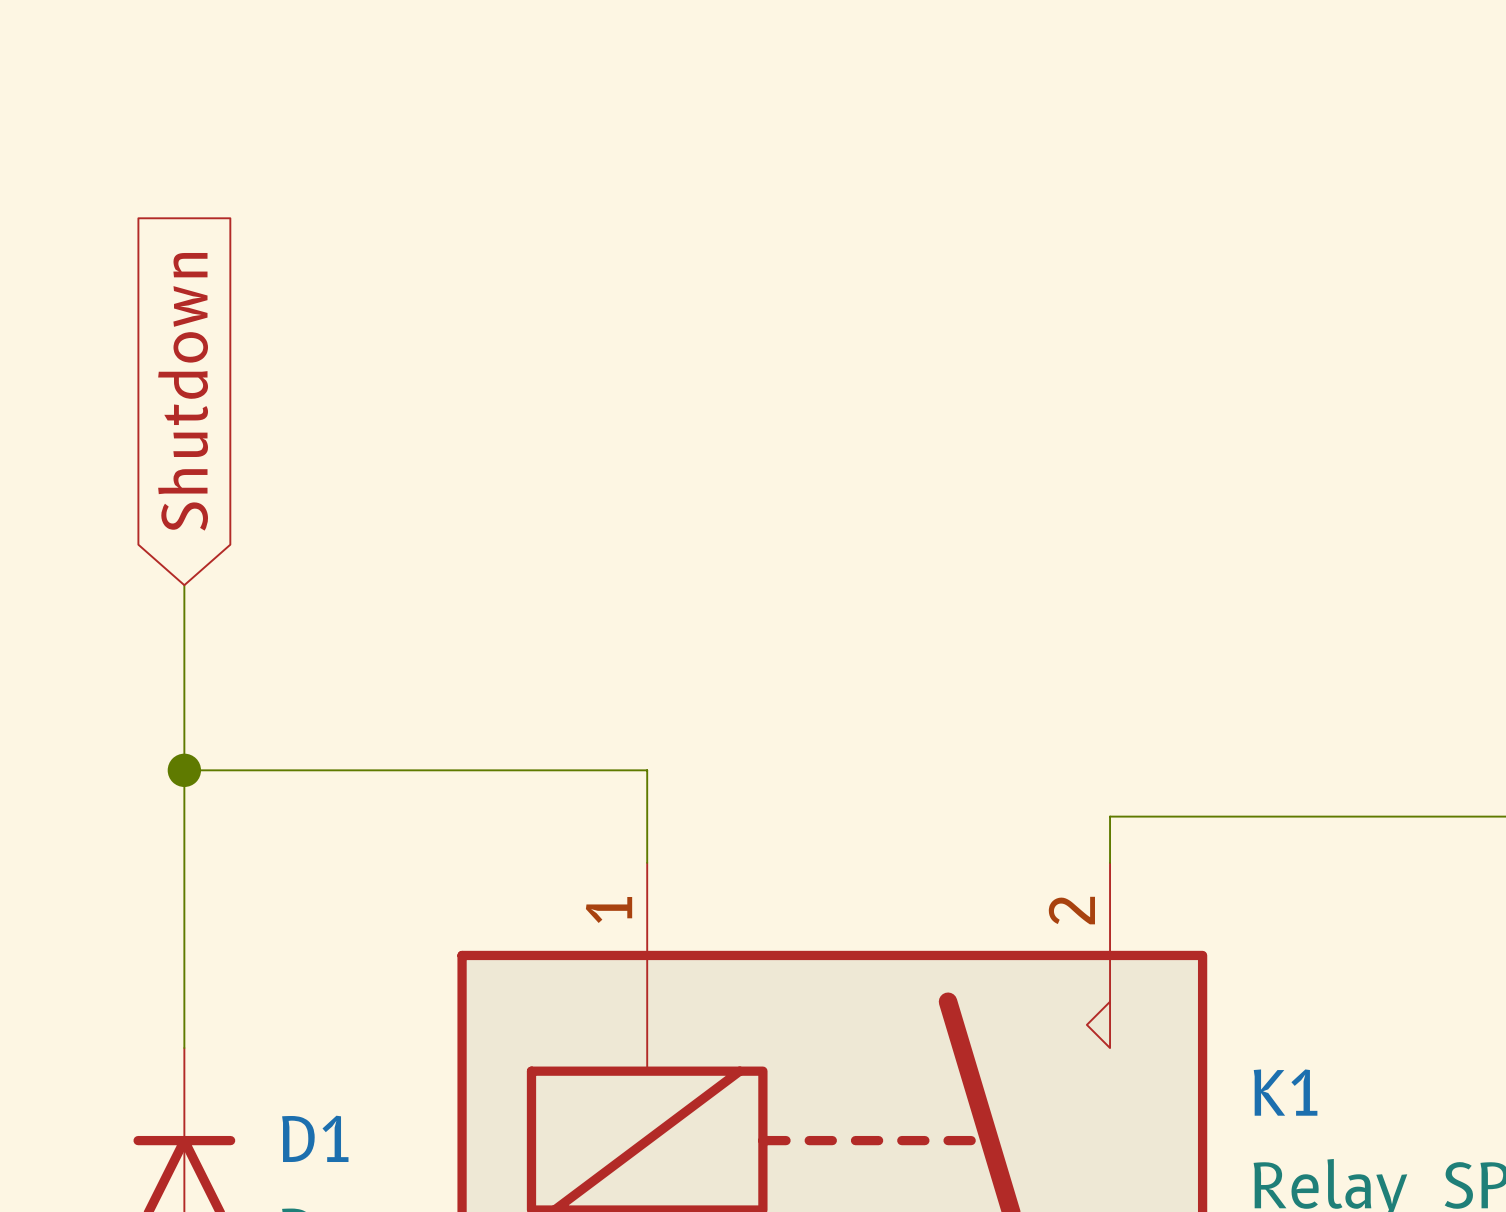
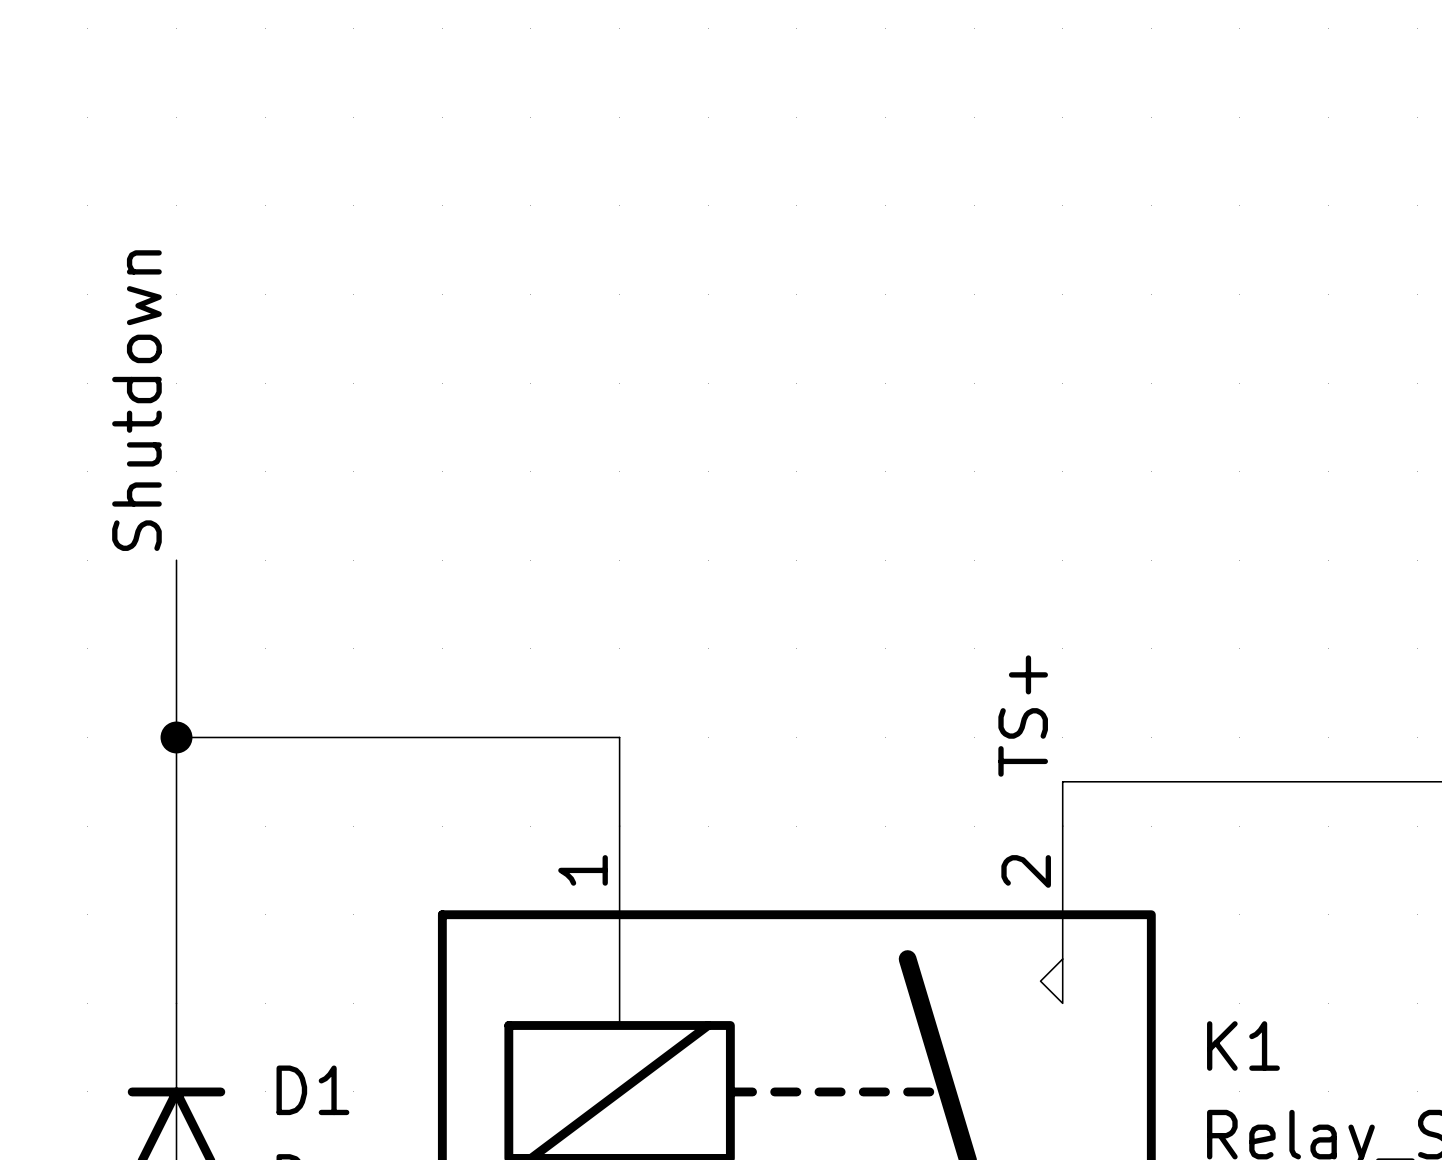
global label: Shutdown (183, 391) -> none
label: none -> Shutdown (136, 400)
label: none -> TS+ (1023, 716)

